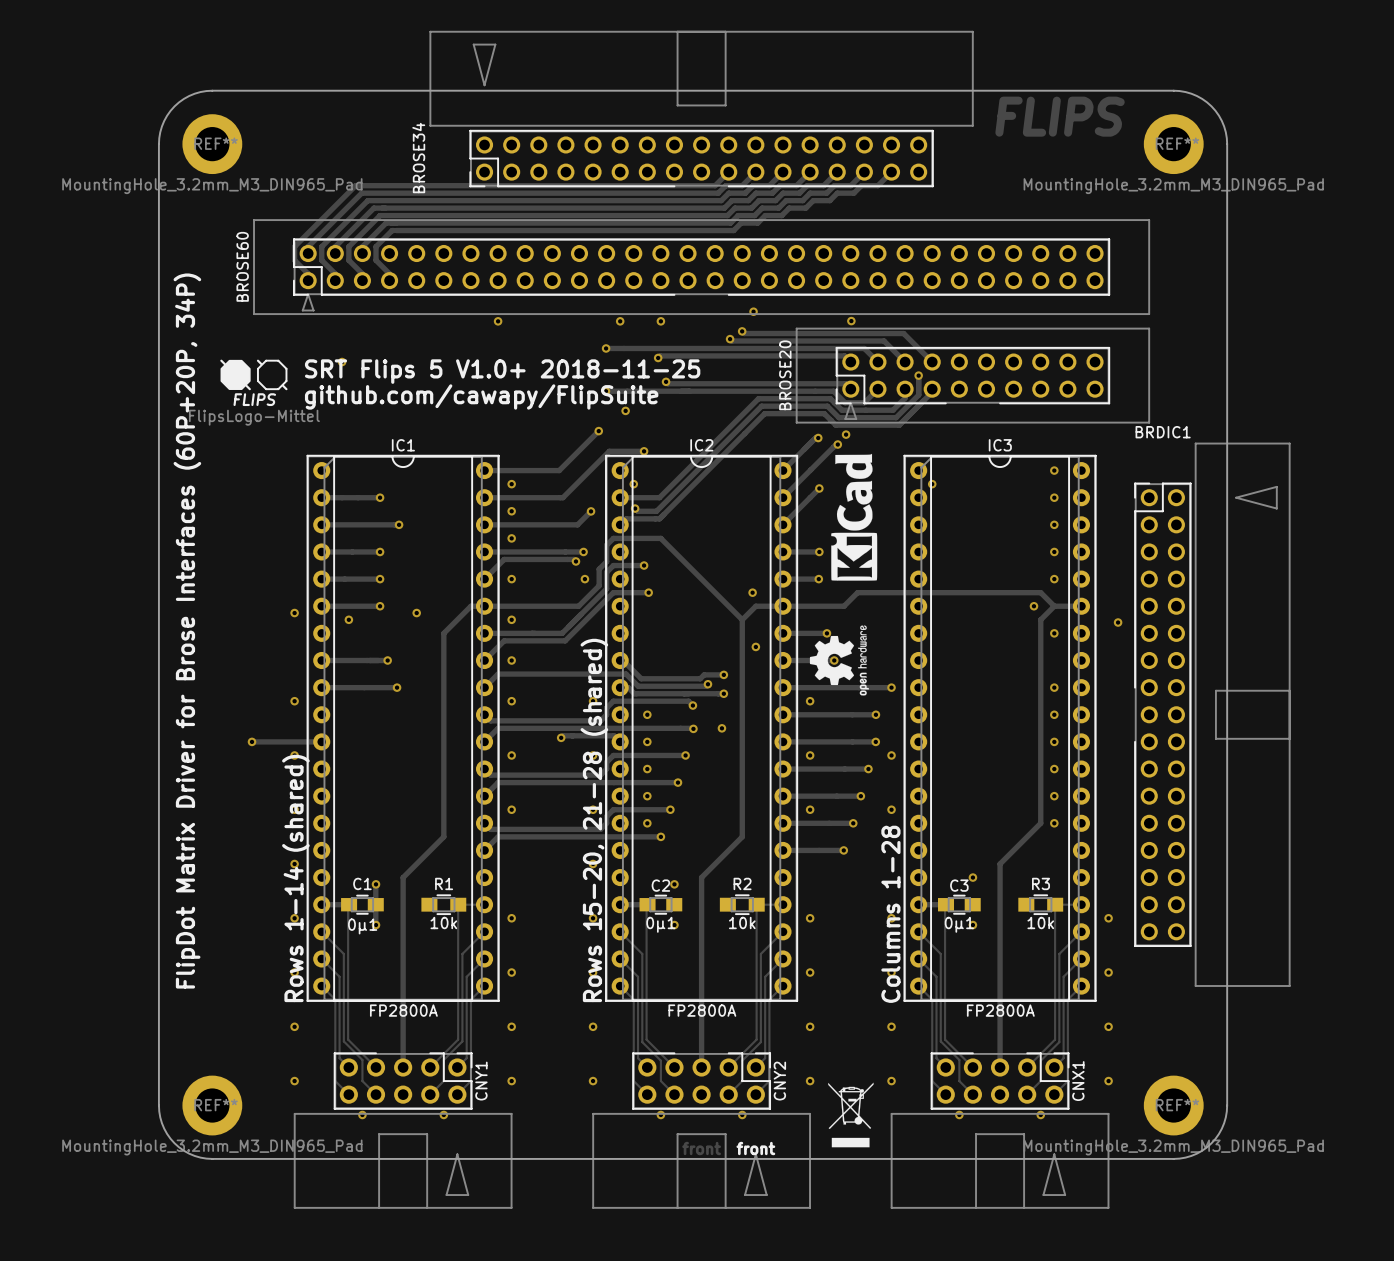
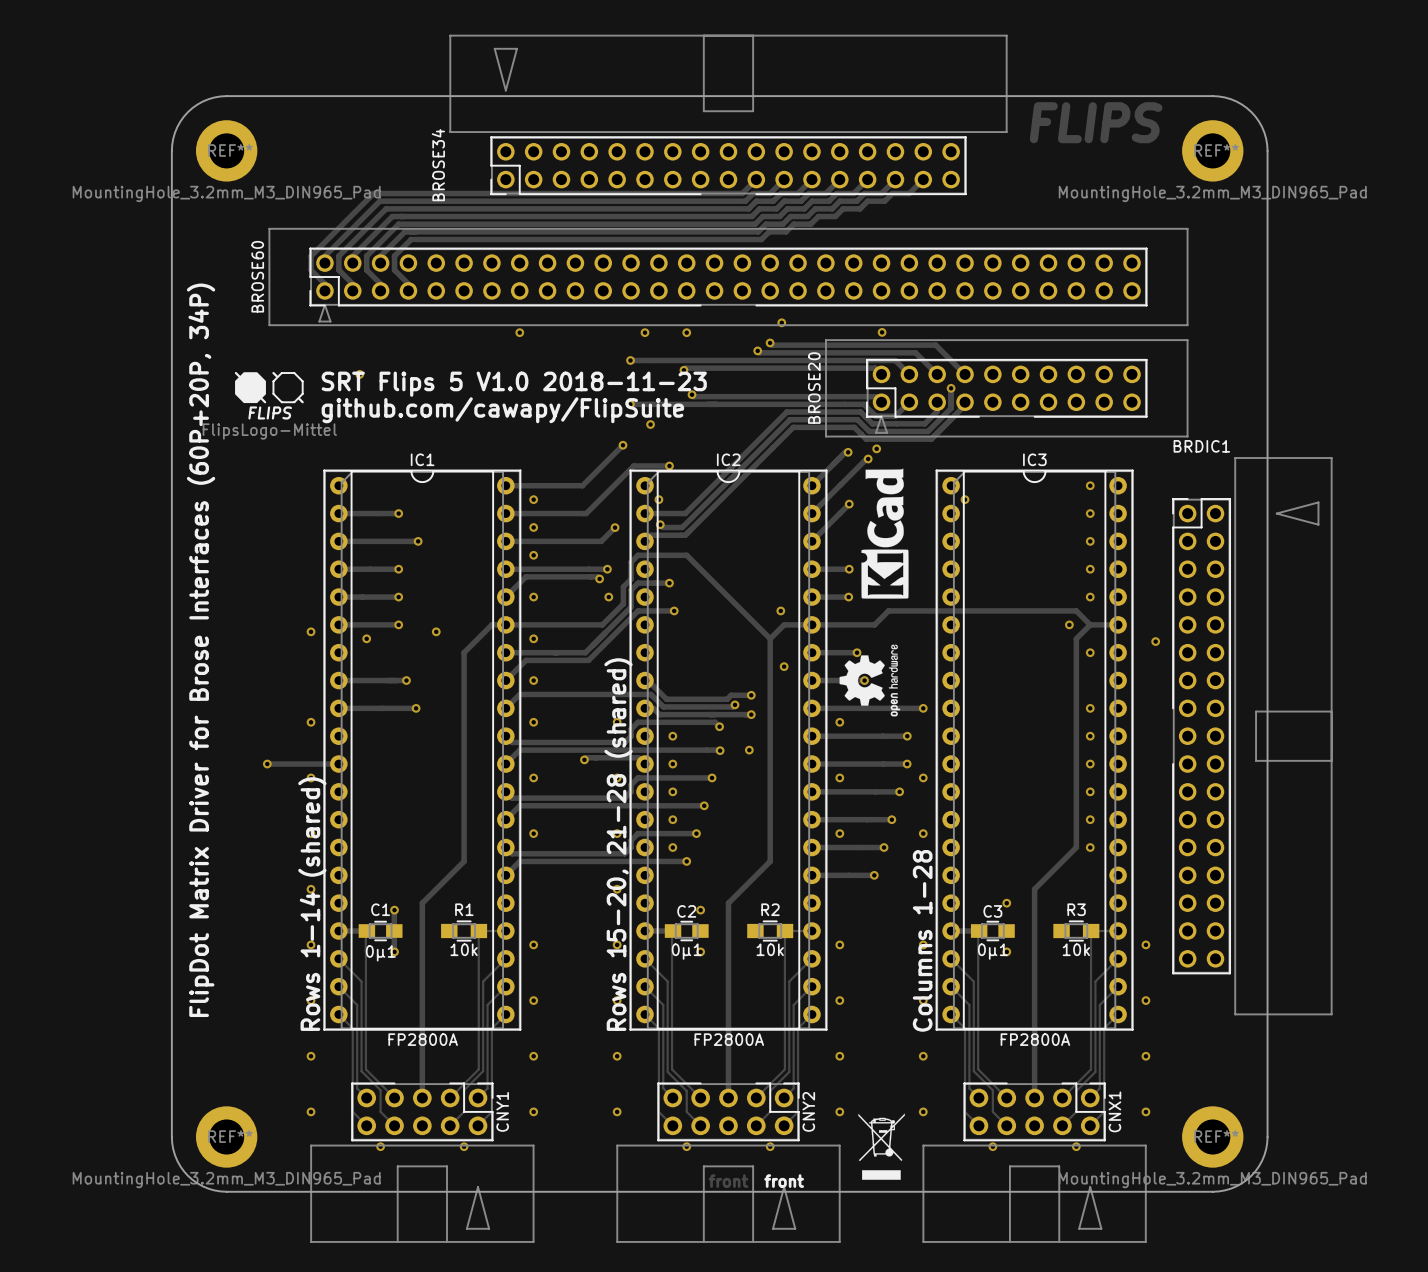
text: SRT Flips 5 V1.0+ 2018-11-25 (502, 371) -> SRT Flips 5 V1.0 2018-11-23 (514, 384)

